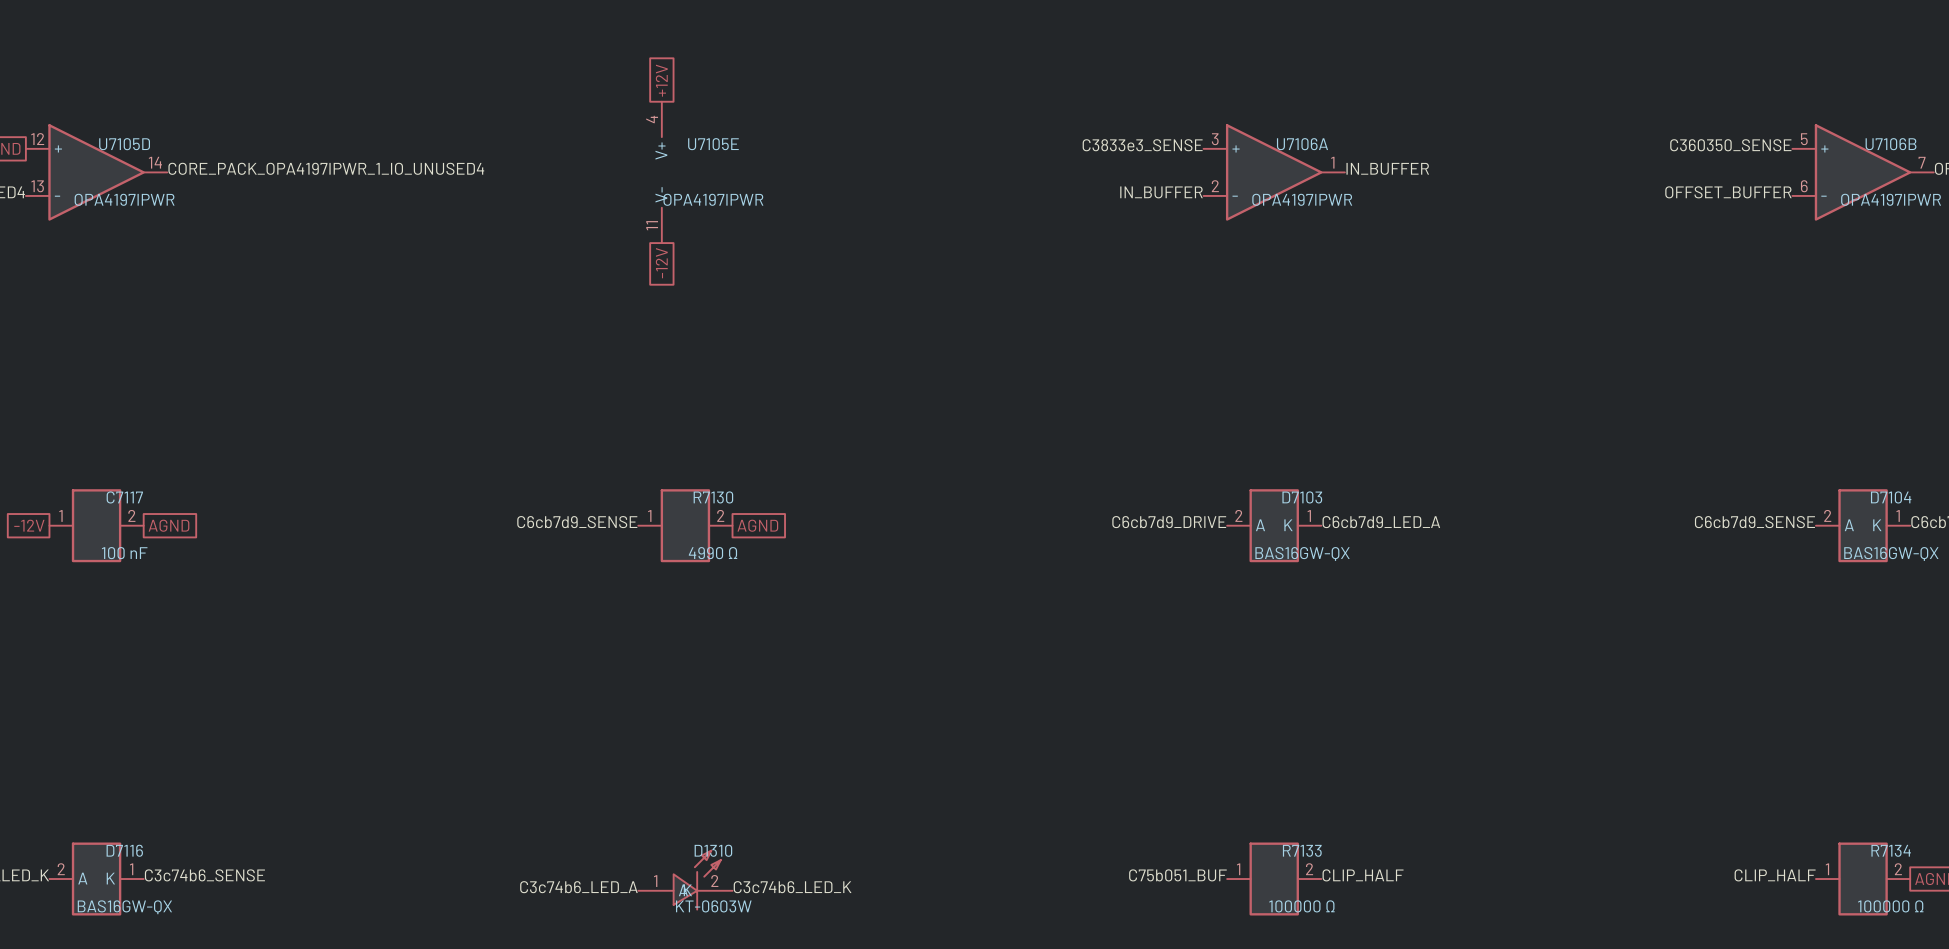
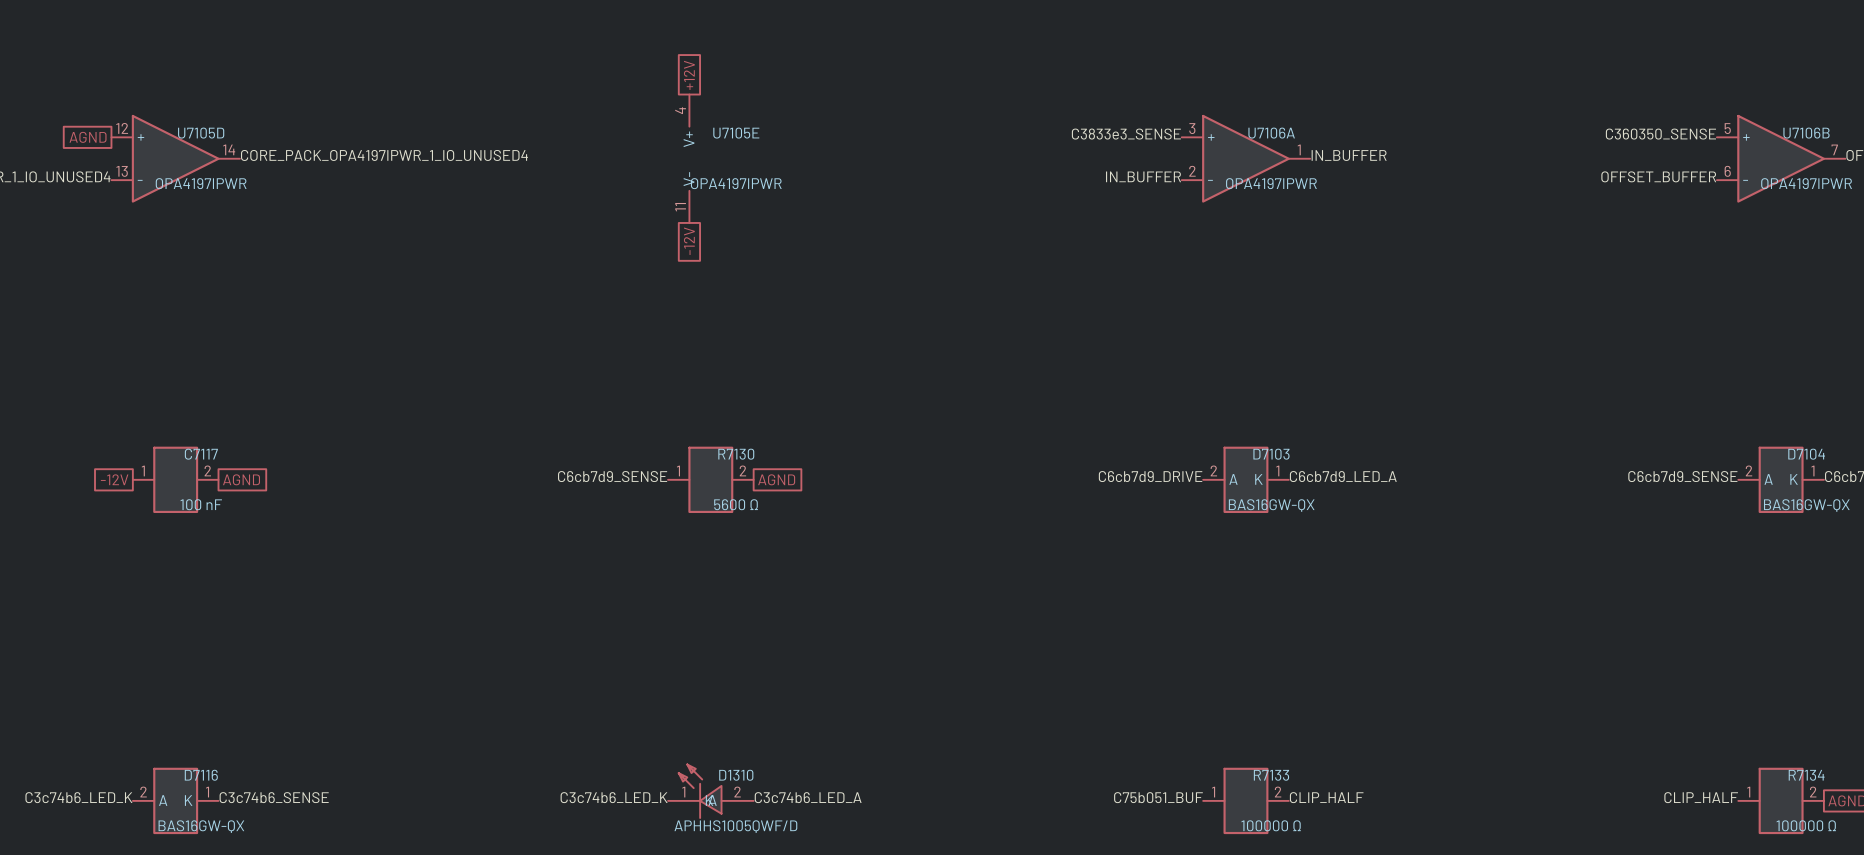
R7130 value: 4990 Ω (713, 553) -> 5600 Ω (736, 504)
D1310 symbol: [638, 850, 733, 910] -> [668, 764, 754, 819]
label position: C3c74b6_LED_A (578, 887) -> C3c74b6_LED_A (808, 797)
label position: C3c74b6_LED_K (792, 887) -> C3c74b6_LED_K (614, 797)
D1310 value: KT-0603W (713, 906) -> APHHS1005QWF/D (735, 826)

